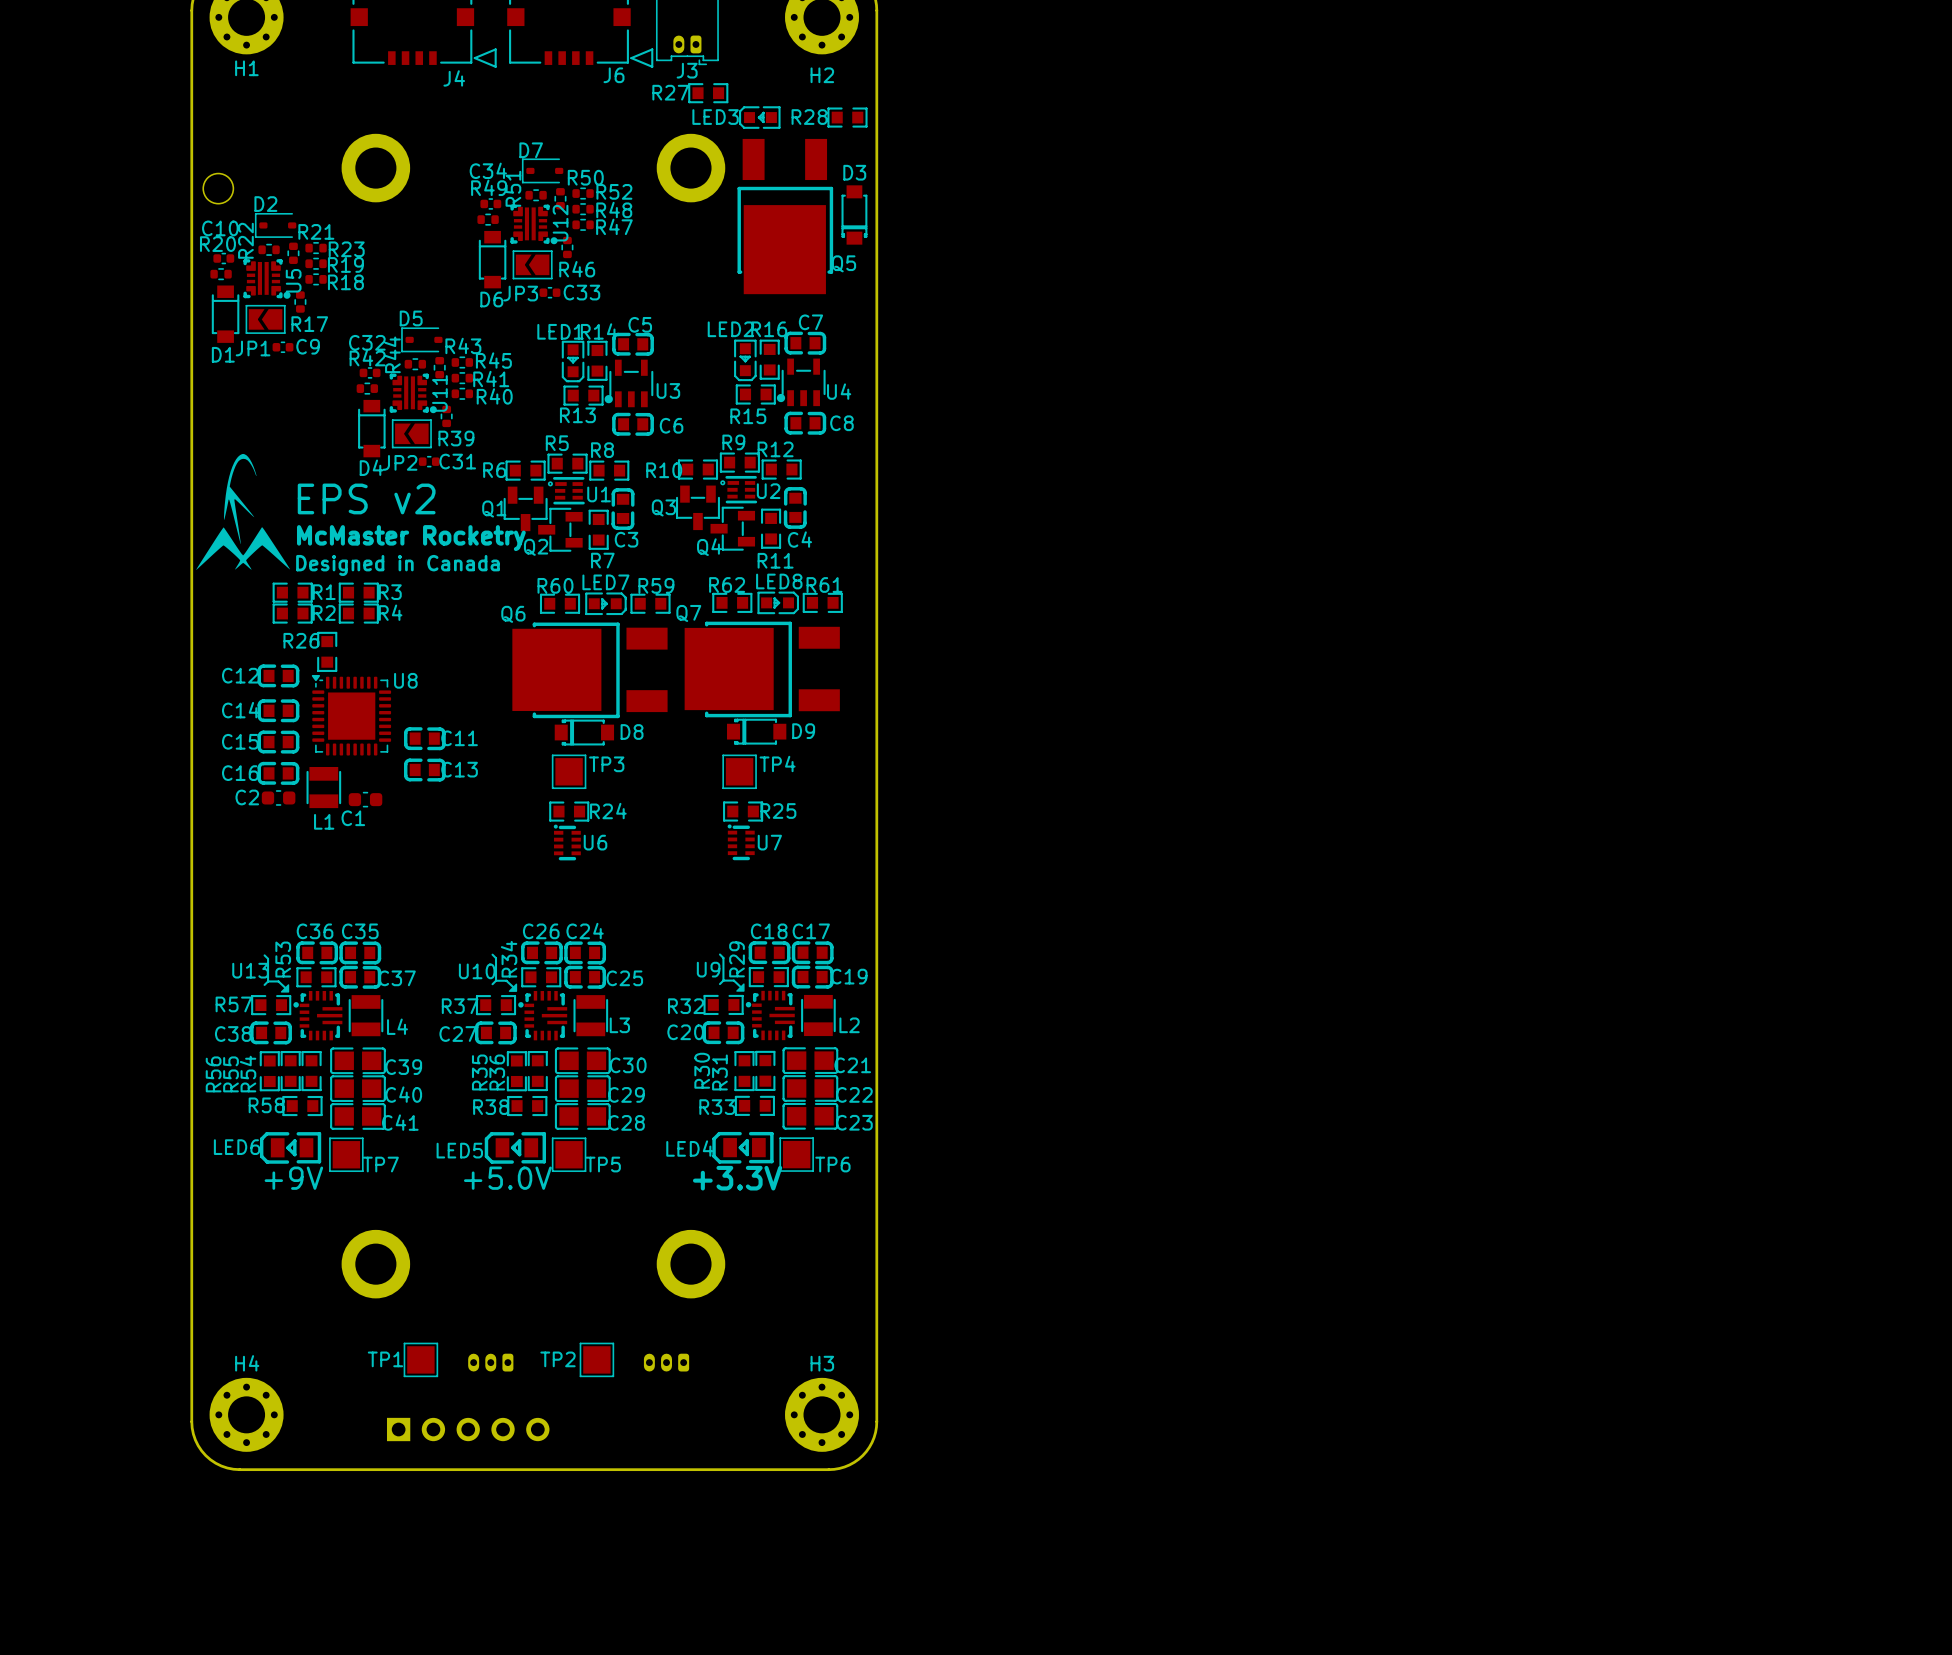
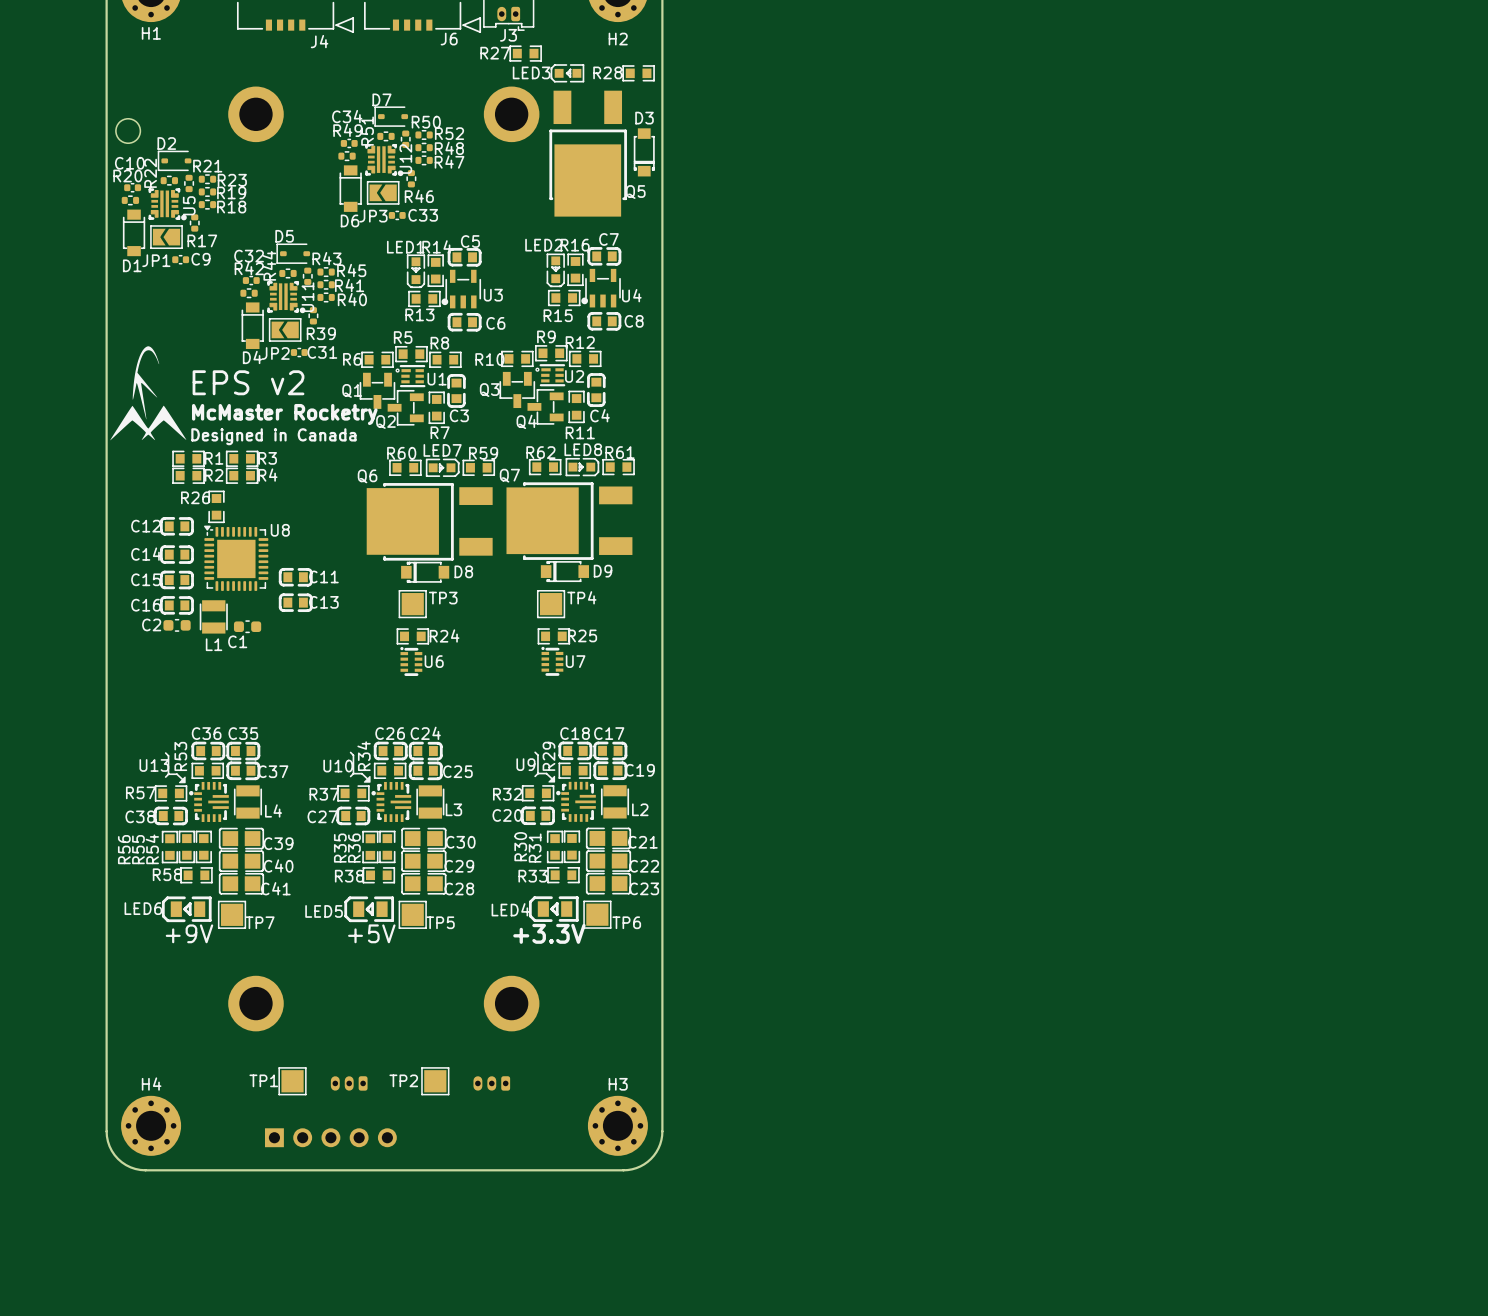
text: +5.0V (507, 1178) -> +5V (371, 933)

